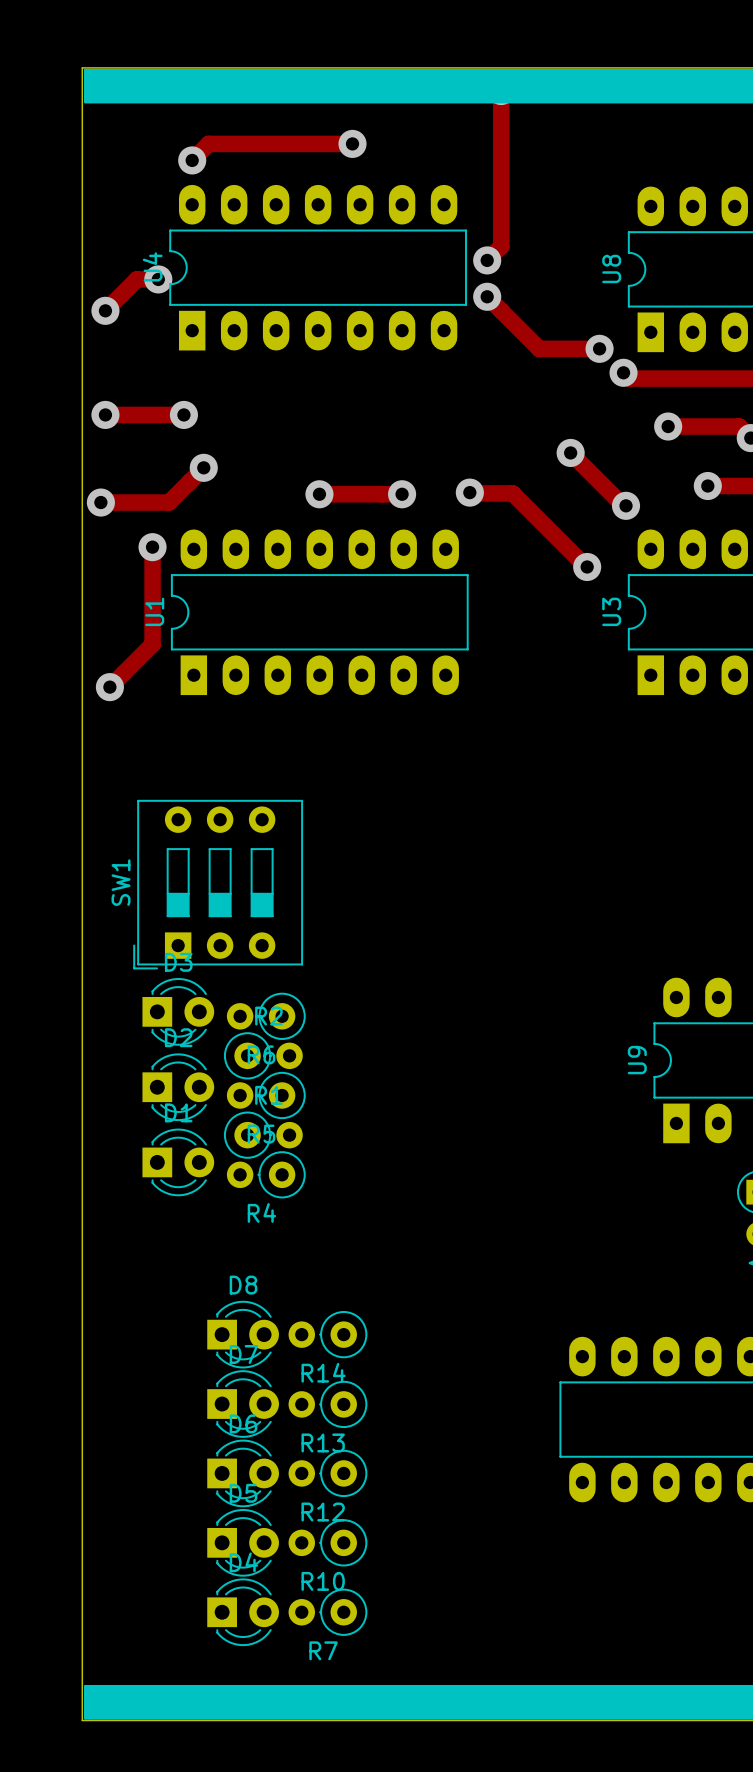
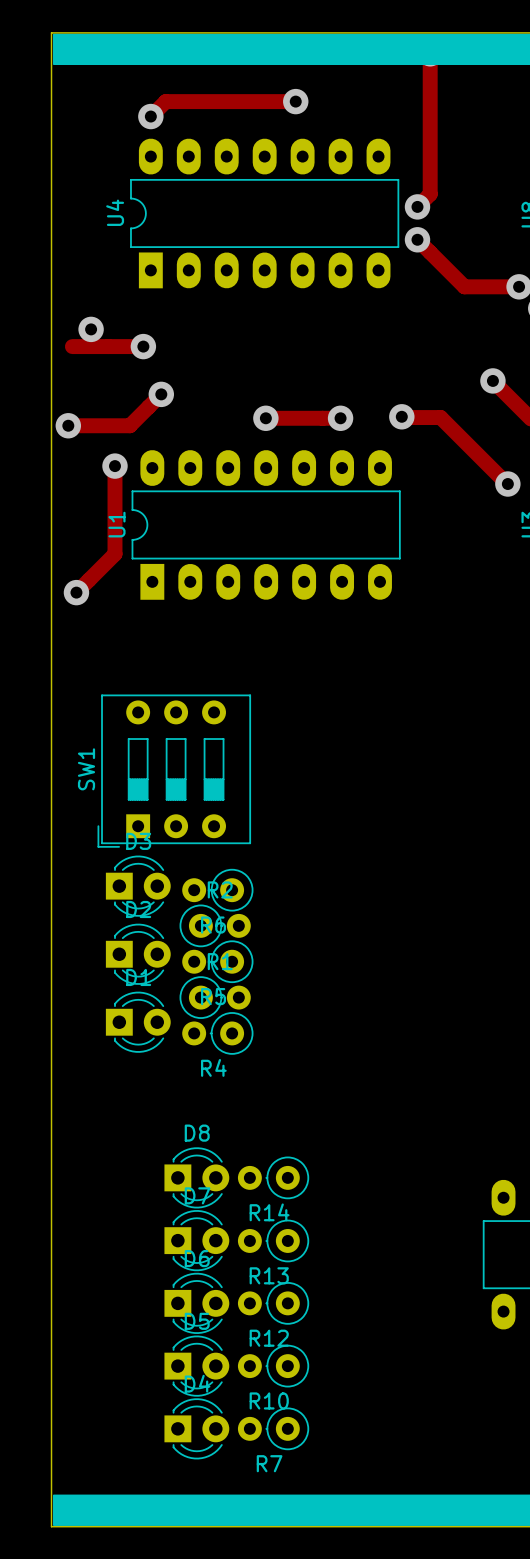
track: (158, 279) (136, 279) (105, 310) -> none
via: (158, 279) -> none
via: (105, 310) -> none
via position: (105, 414) -> (91, 329)

